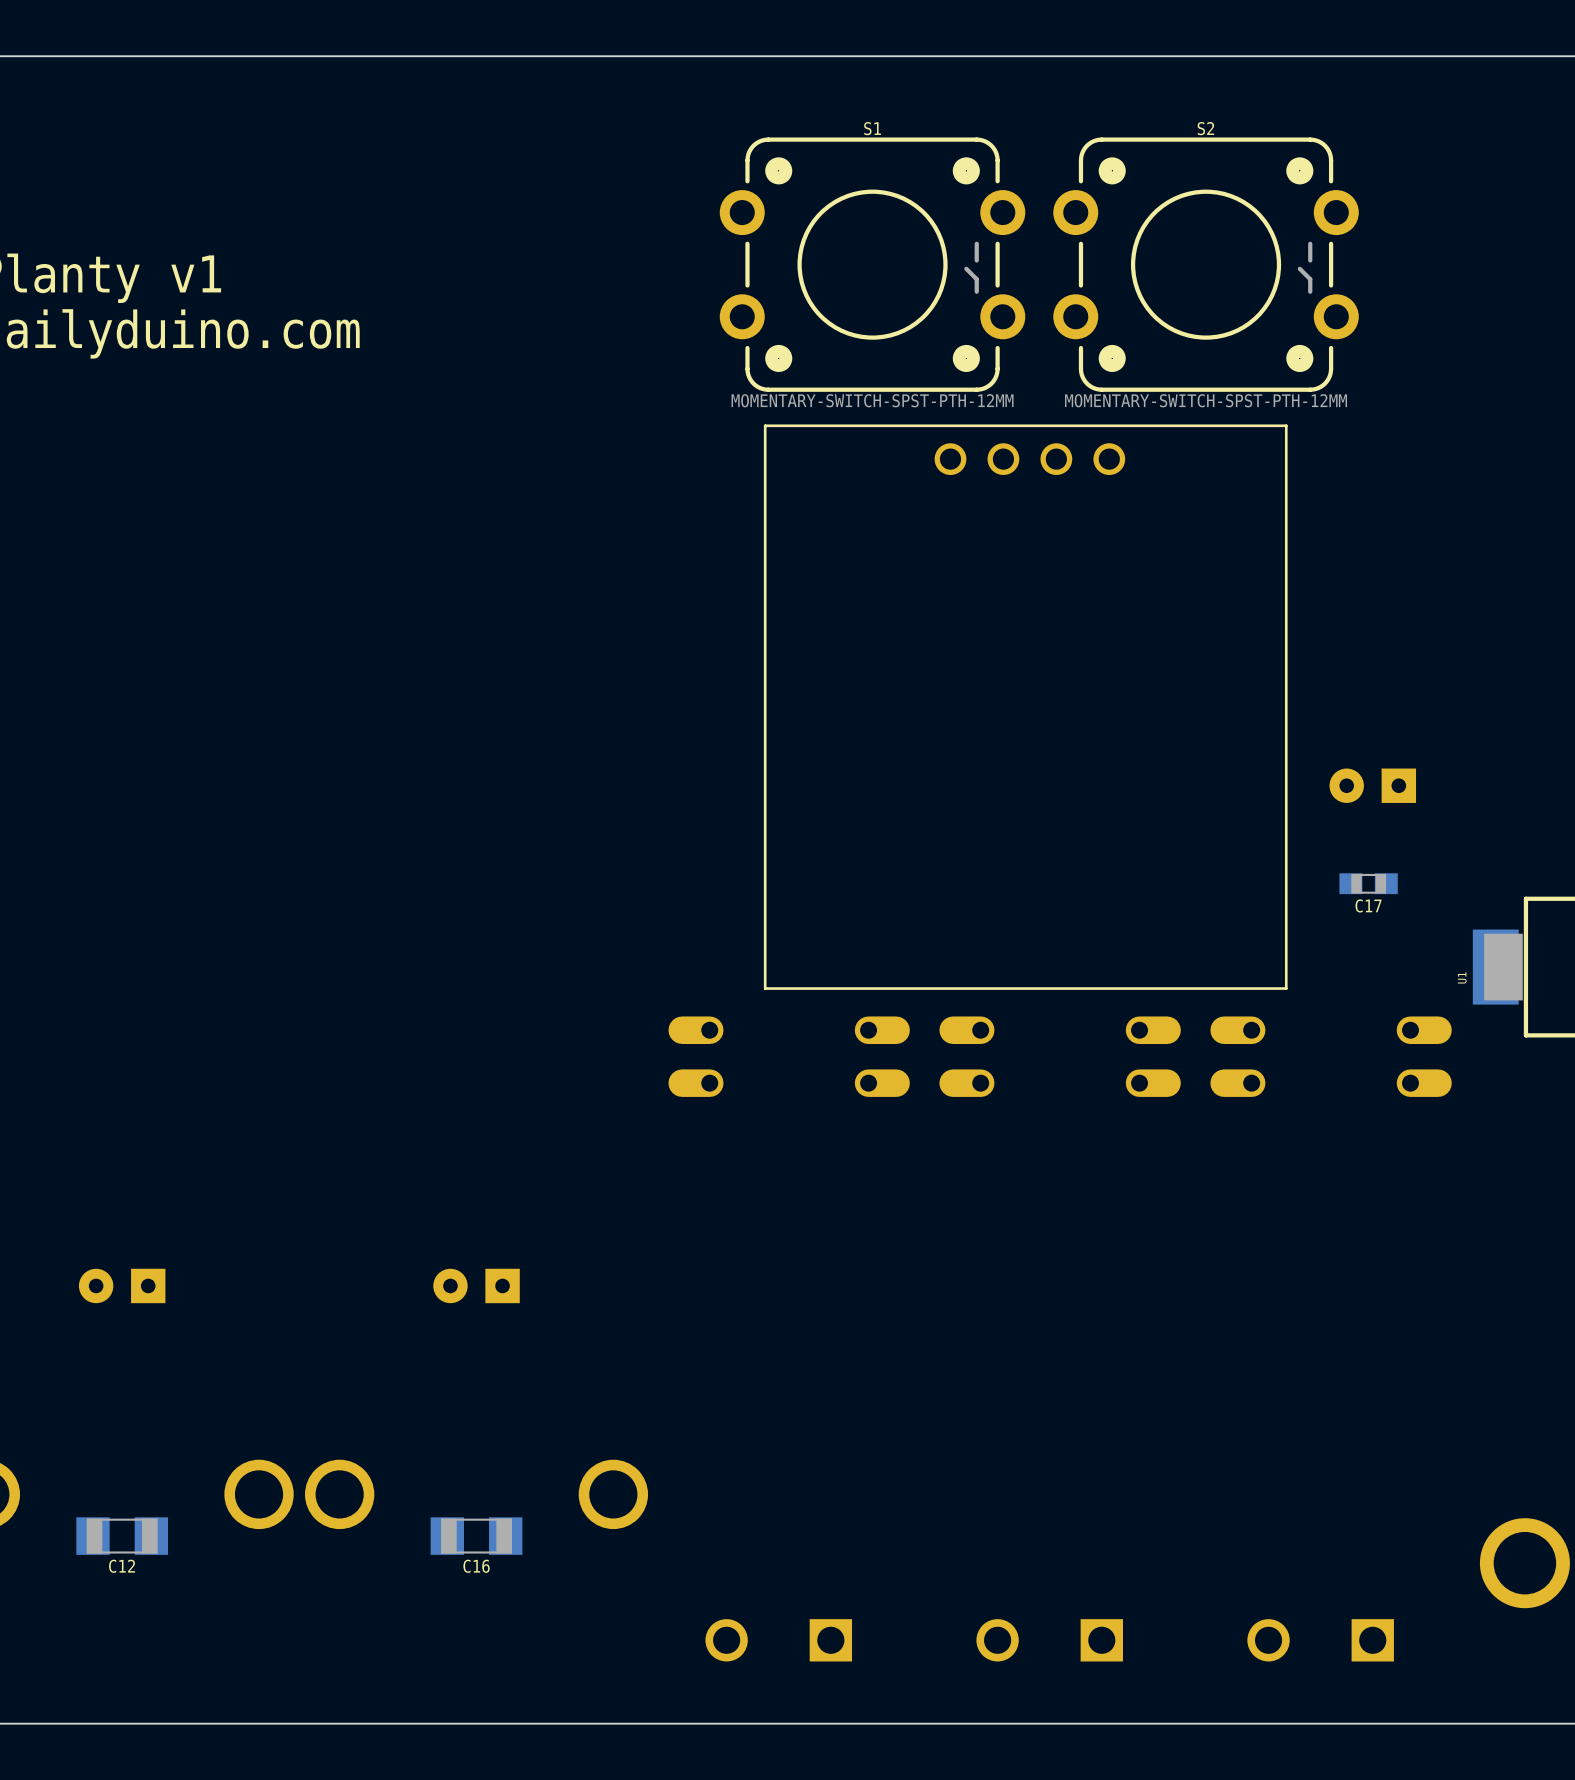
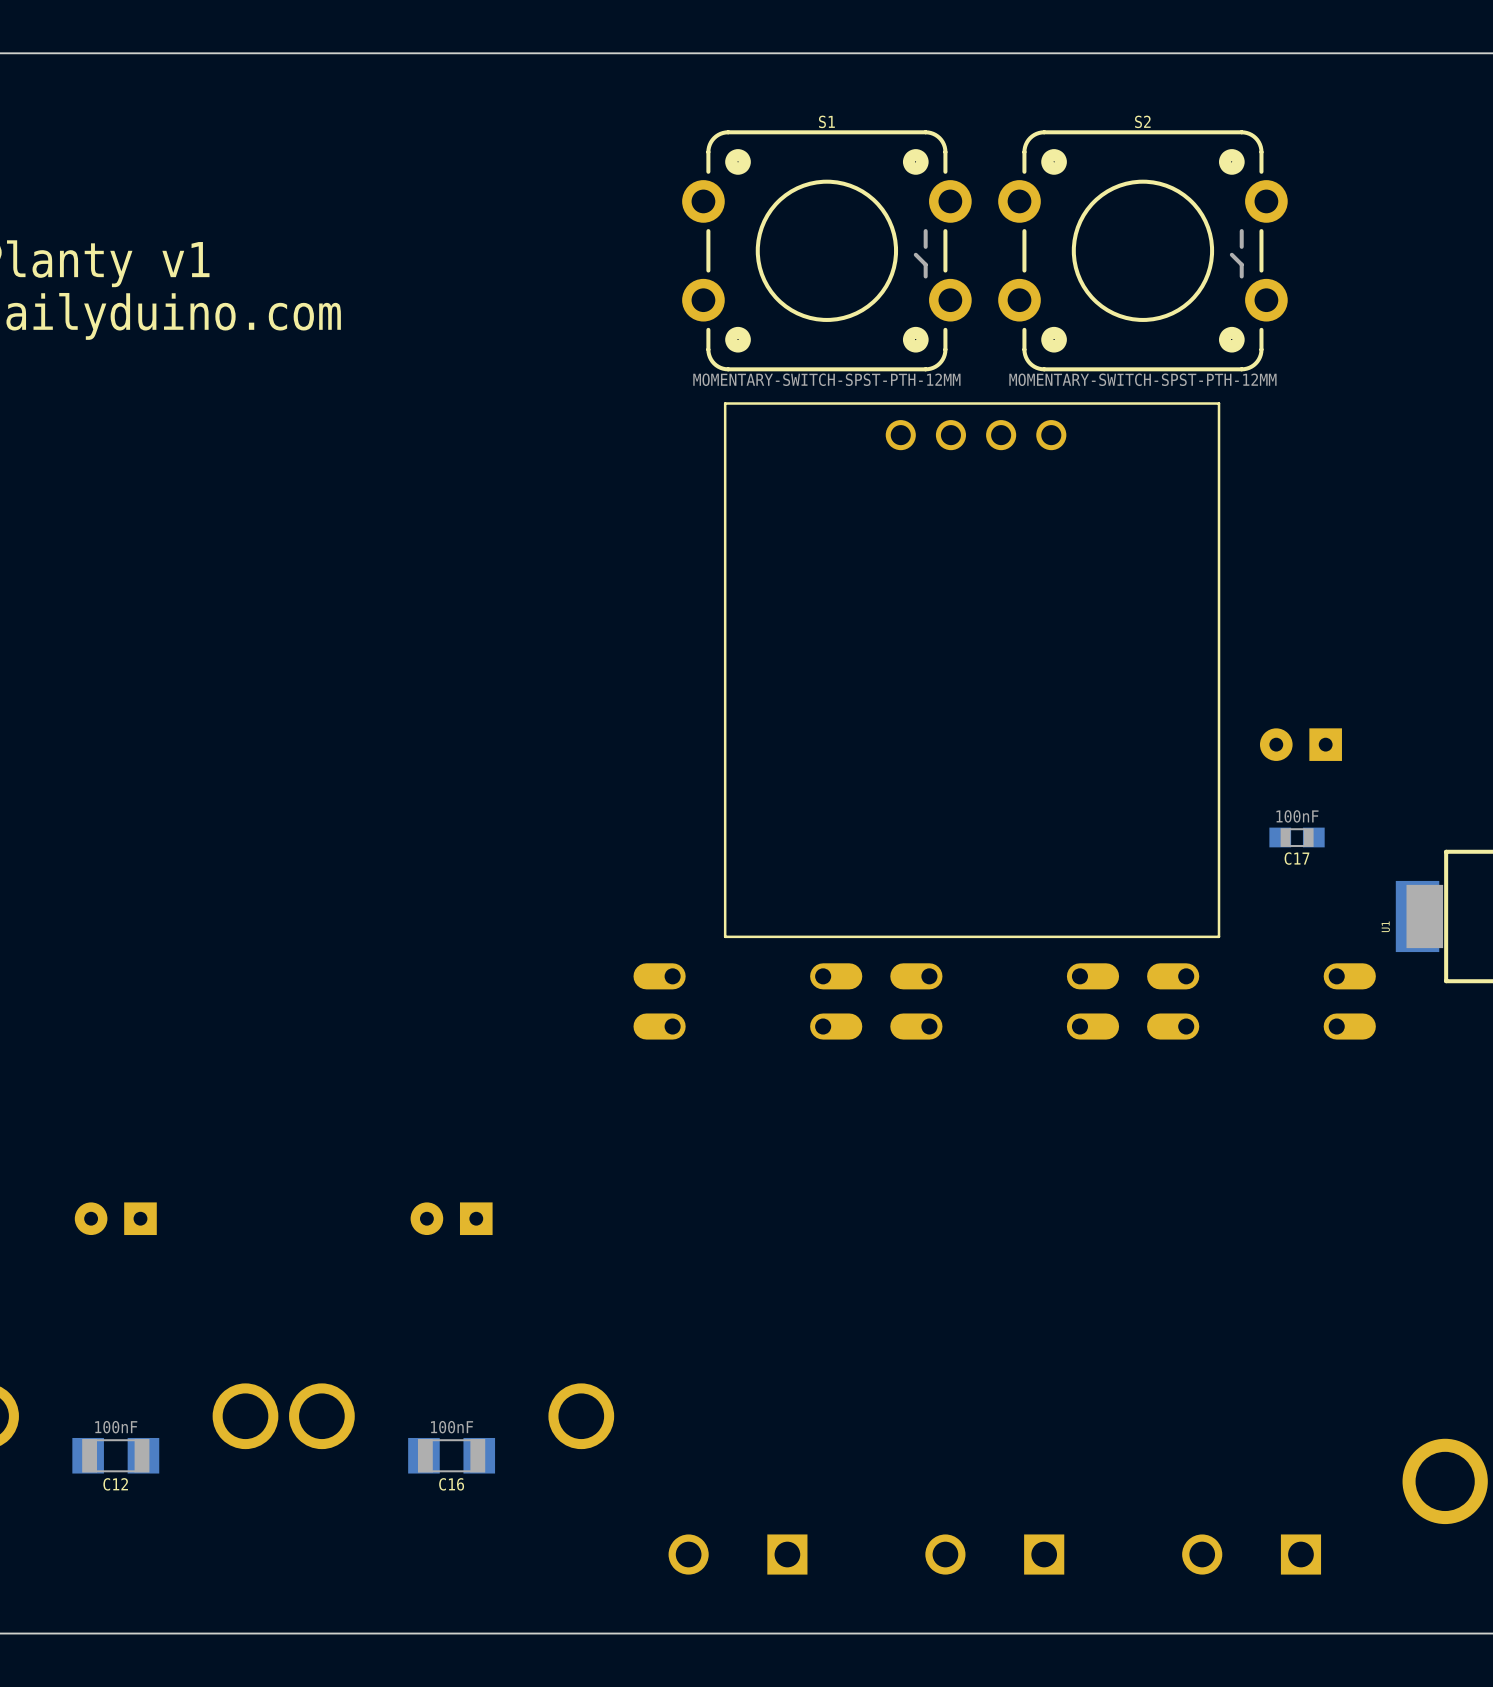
C17 value: none -> 100nF (1297, 816)
C12 value: none -> 100nF (116, 1427)
C16 value: none -> 100nF (452, 1427)

